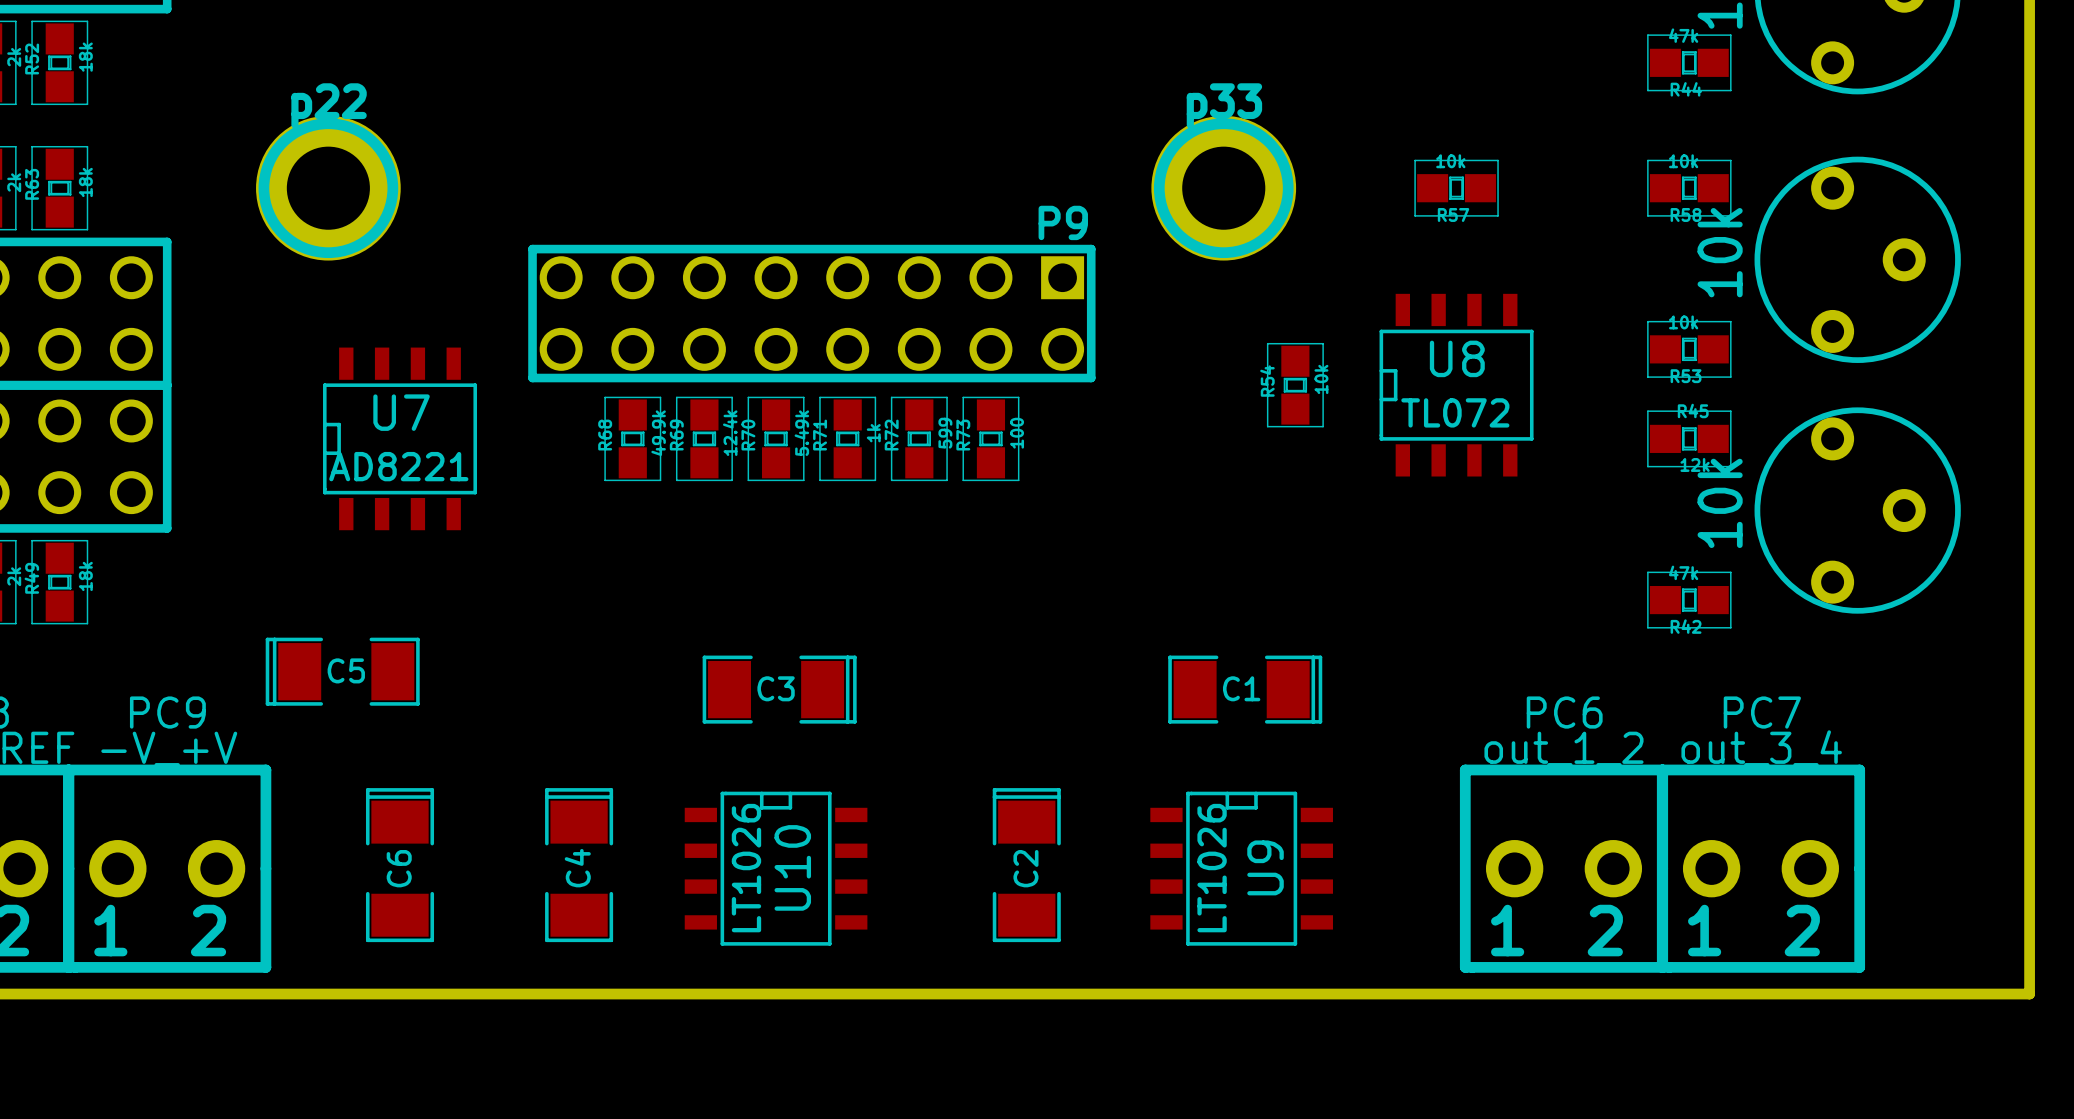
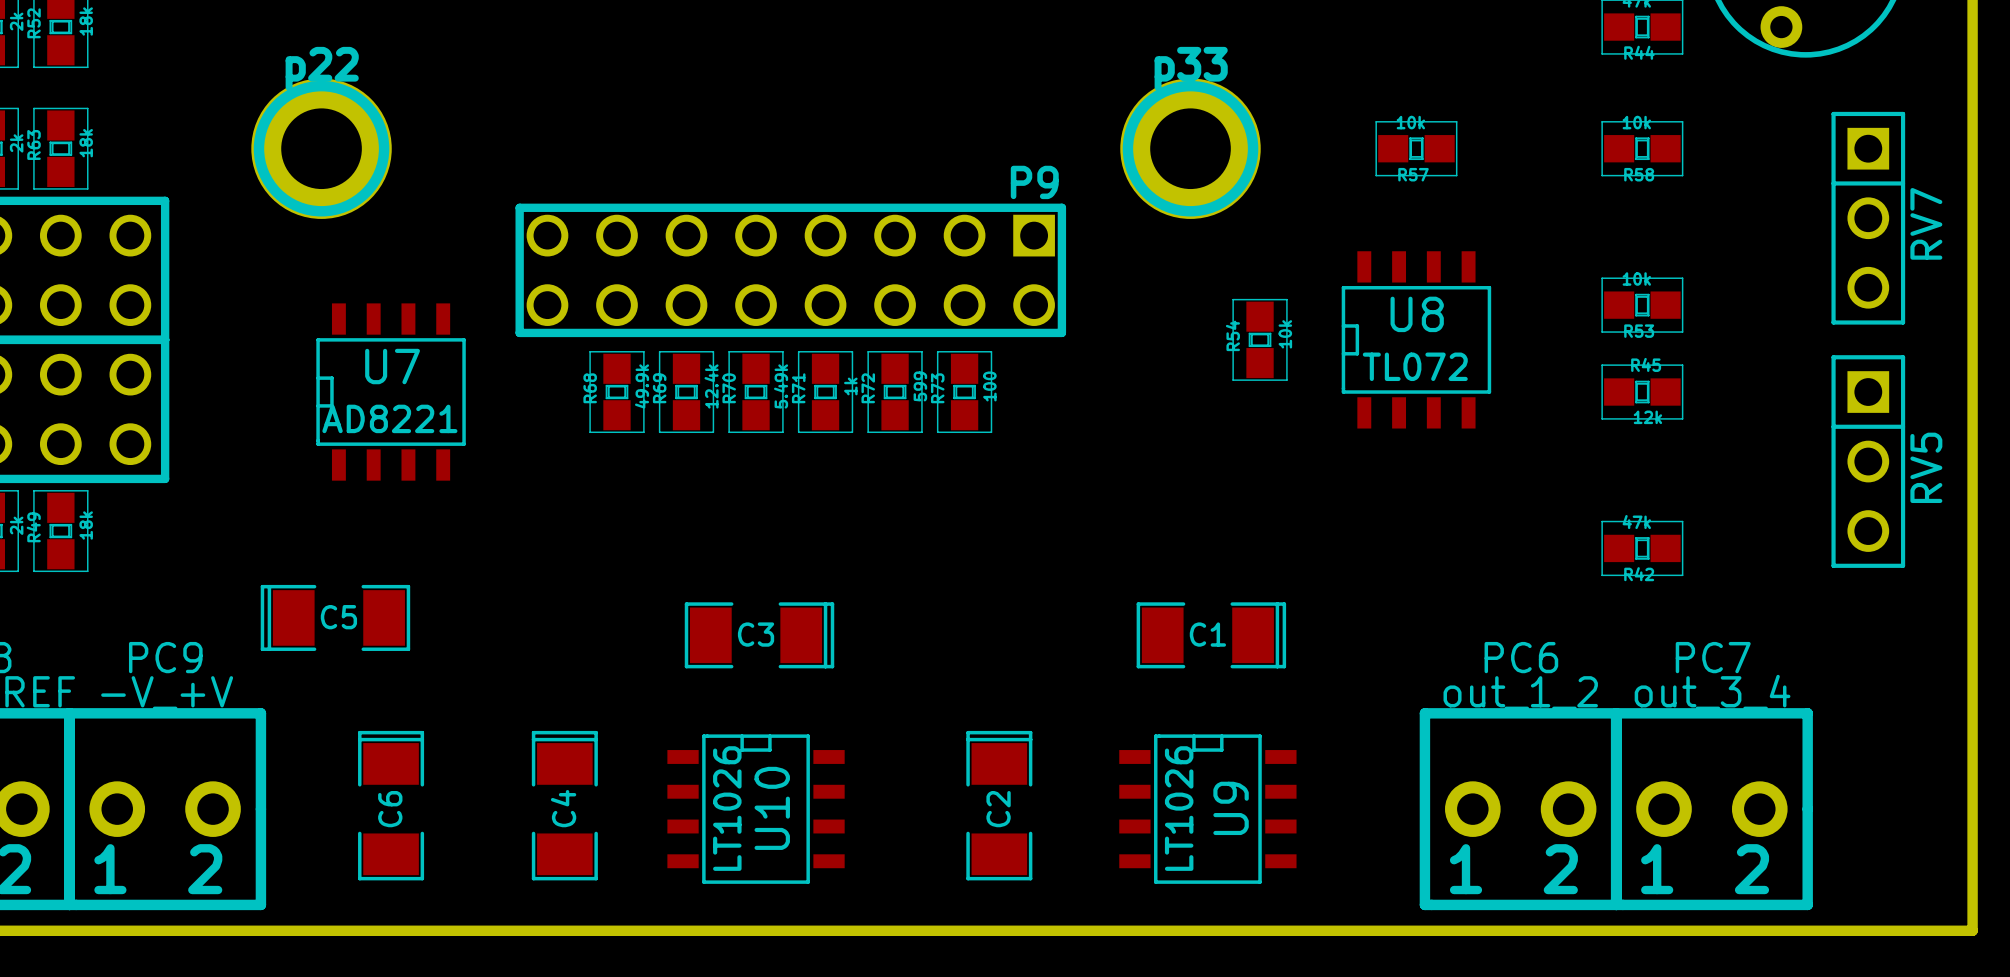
part: 10k (1857, 259) -> none
RV7: none -> (1868, 218)
part: 10k (1857, 510) -> none
RV5: none -> (1868, 461)

